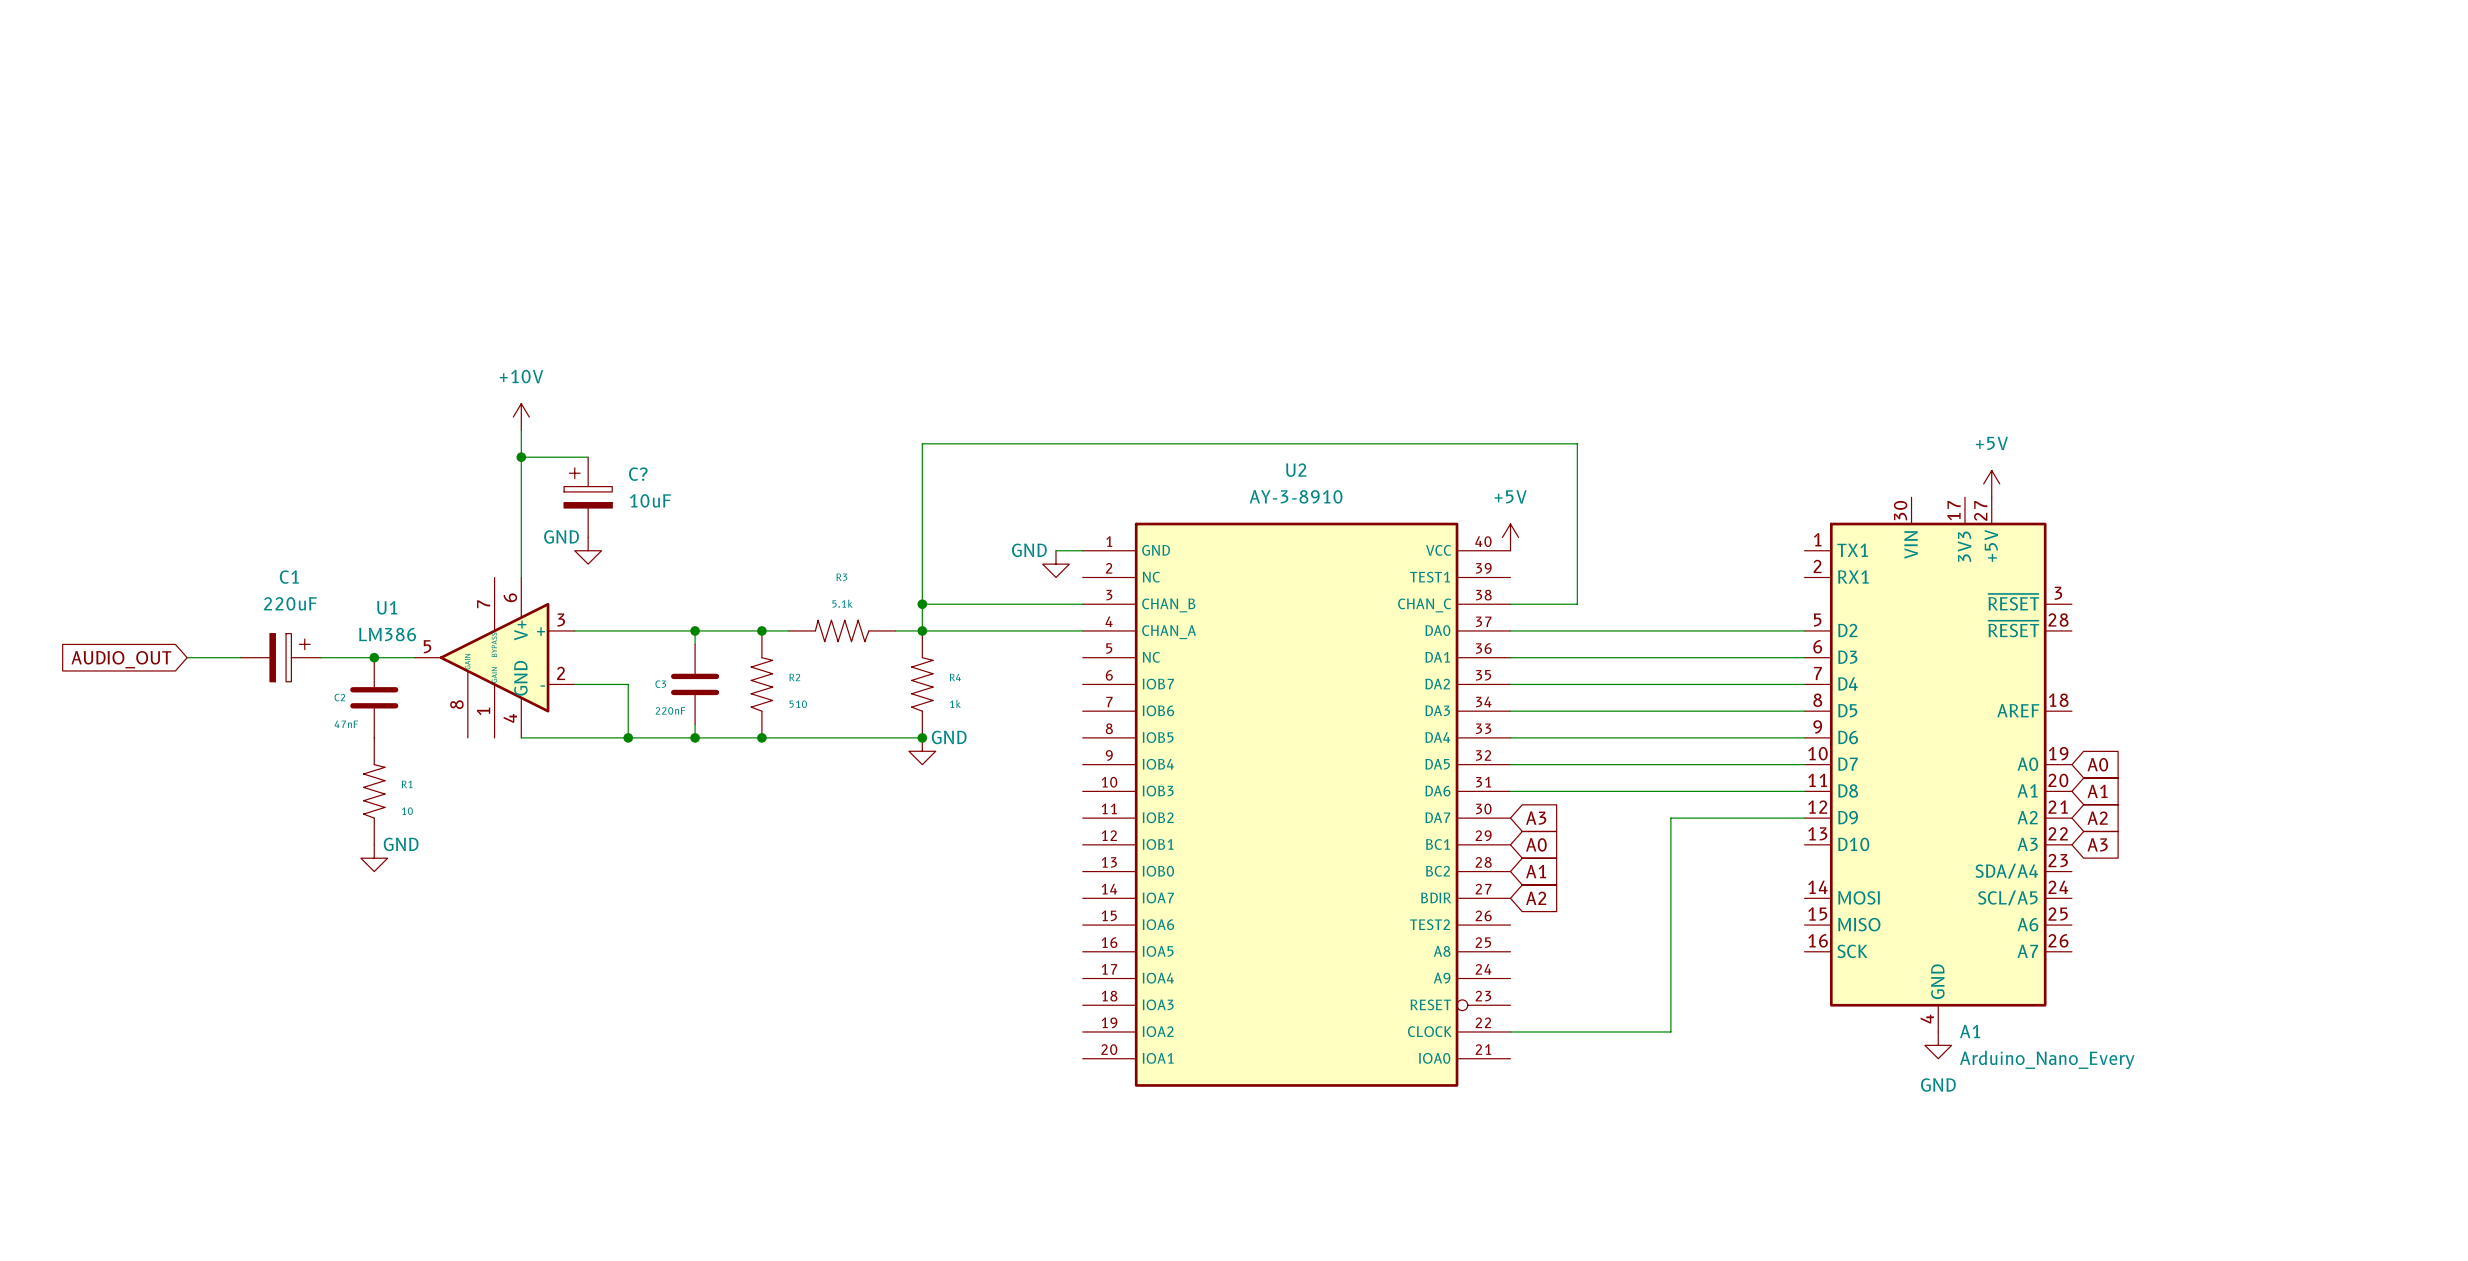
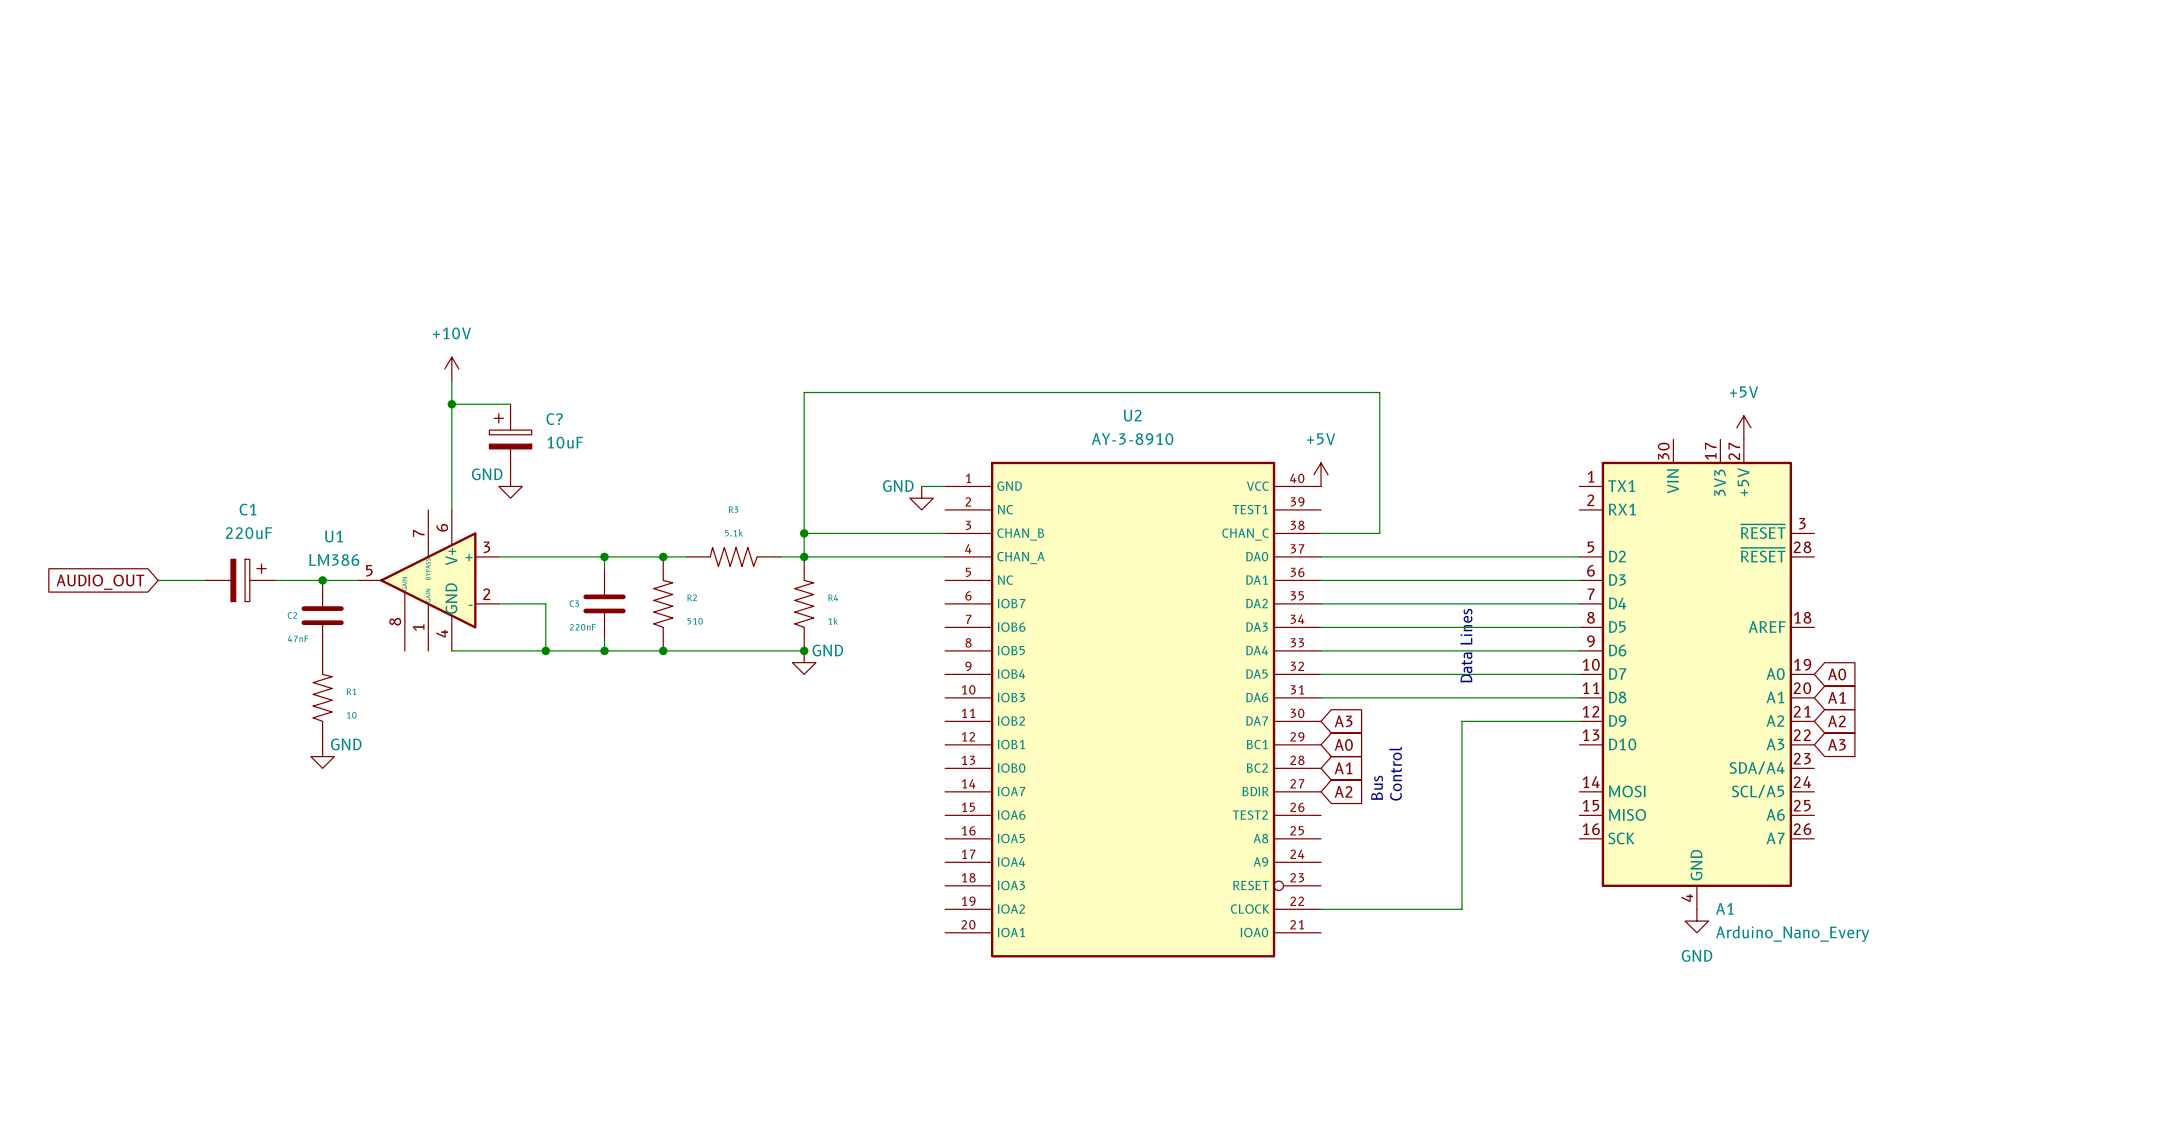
text: none -> Data Lines (1466, 645)
text: none -> Control (1395, 773)
text: none -> Bus (1377, 787)

